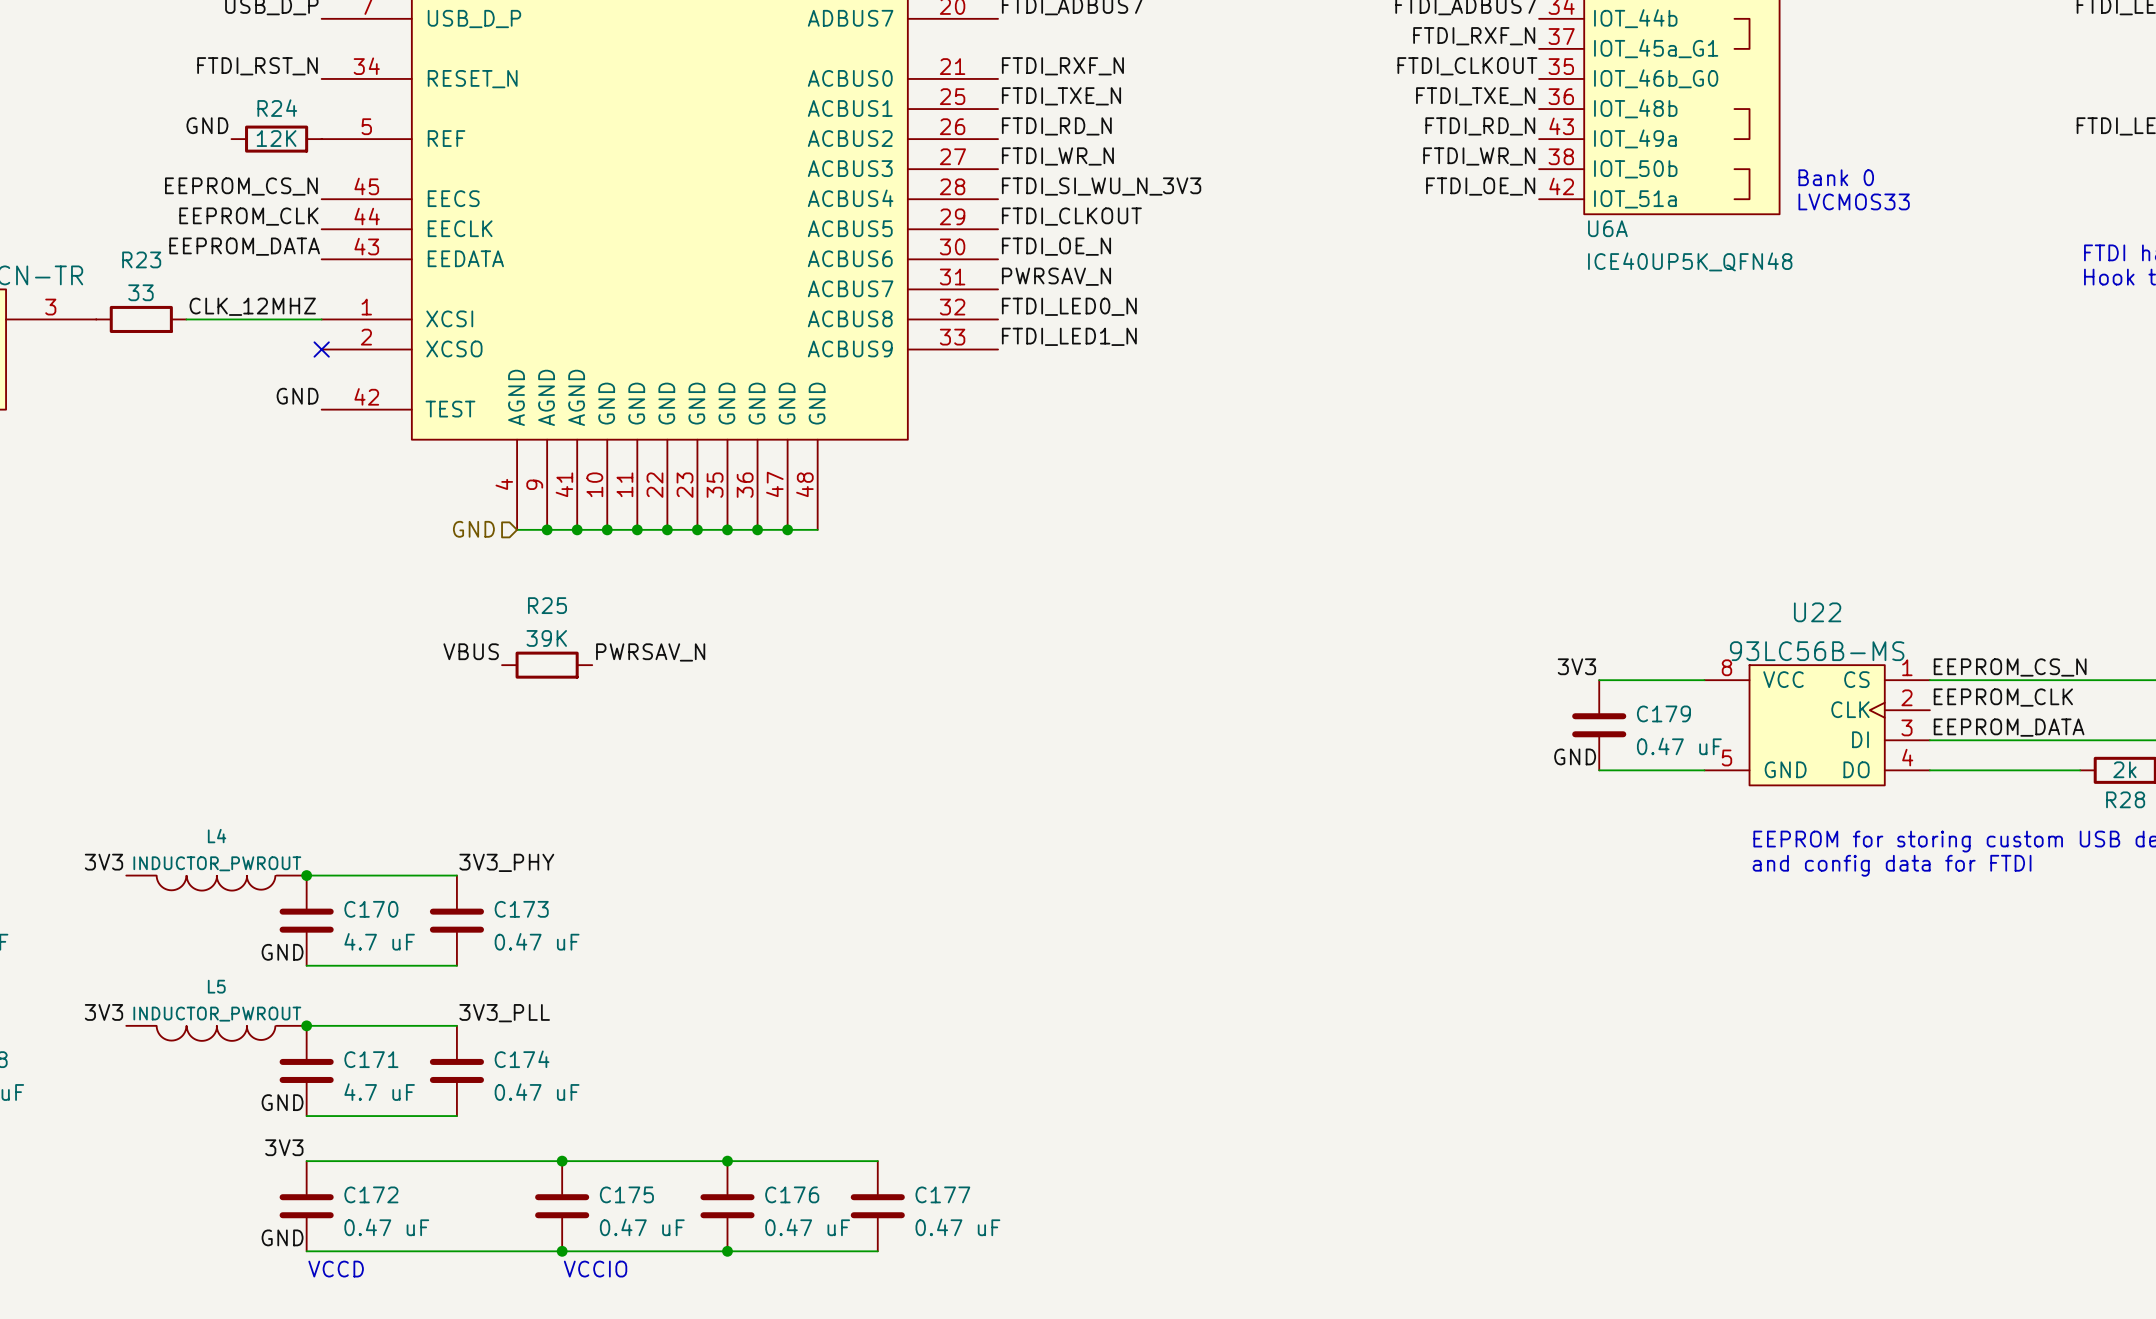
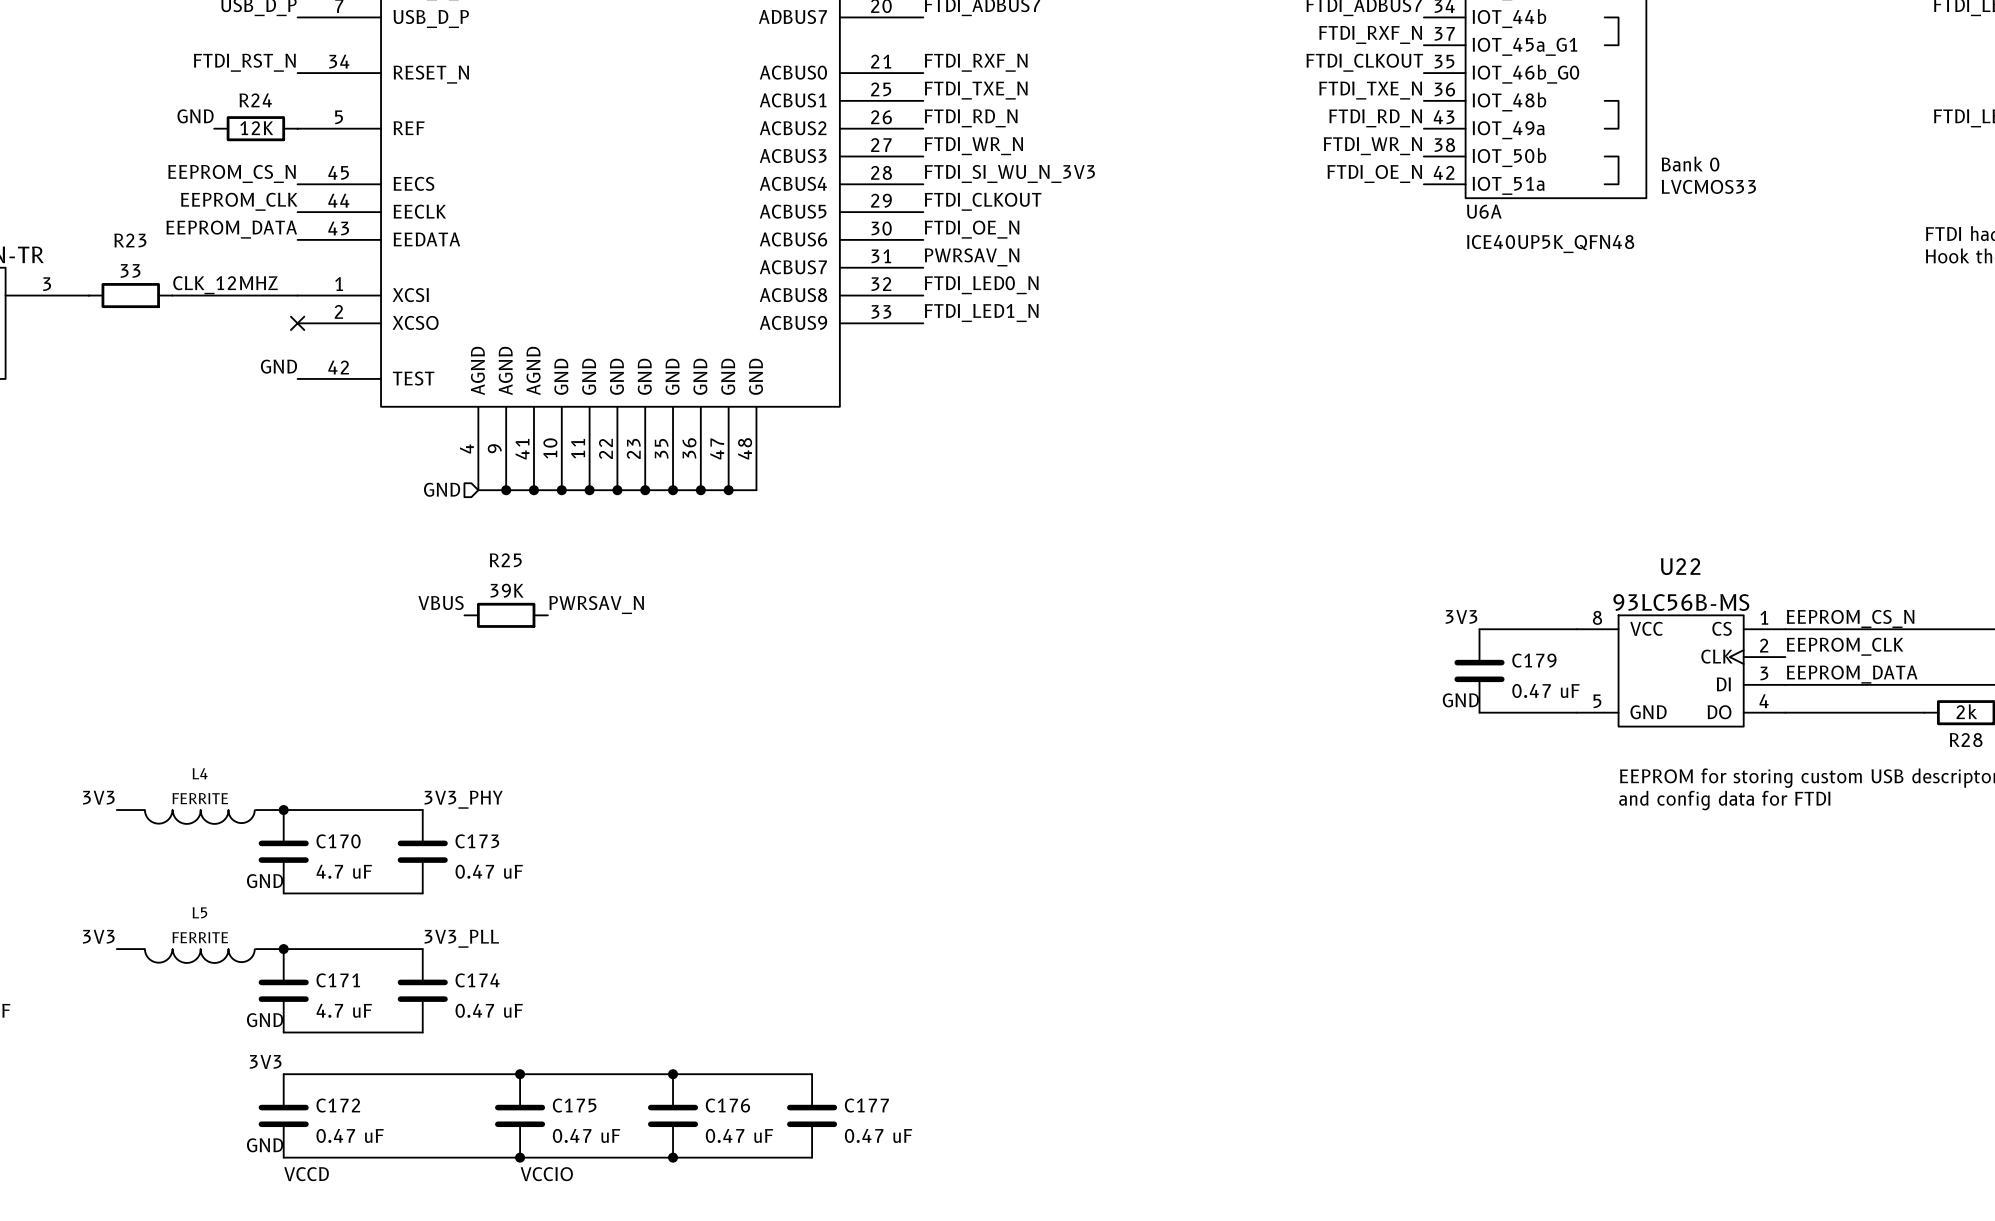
L4 value: INDUCTOR_PWROUT (217, 863) -> FERRITE (200, 798)
L5 value: INDUCTOR_PWROUT (217, 1014) -> FERRITE (200, 937)

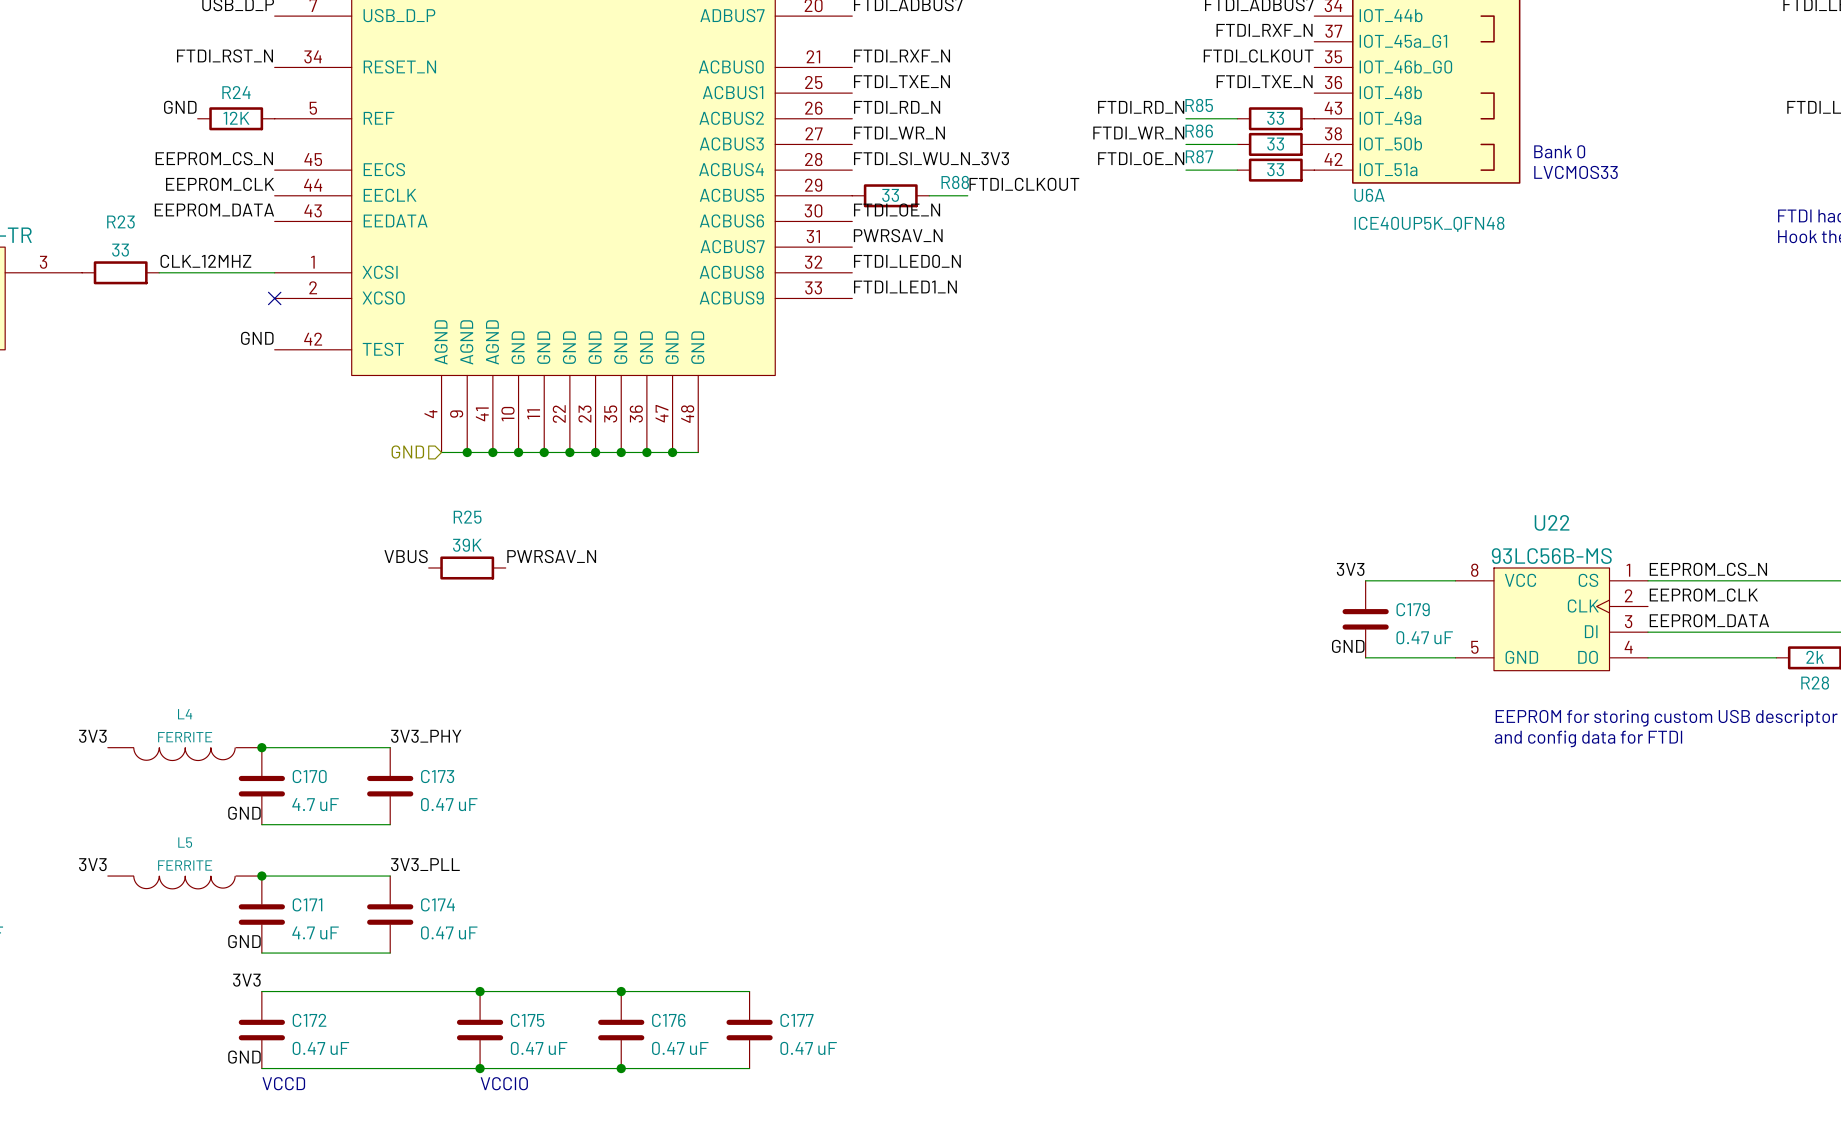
label position: FTDI_RD_N (1375, 118) -> FTDI_RD_N (1141, 107)
wire: none -> (1185, 118) (1237, 118)
R85: none -> 33 (1275, 118)
label position: FTDI_WR_N (1372, 146) -> FTDI_WR_N (1138, 132)
wire: none -> (1185, 144) (1237, 144)
R86: none -> 33 (1275, 144)
label position: FTDI_OE_N (1374, 173) -> FTDI_OE_N (1141, 158)
wire: none -> (1185, 170) (1237, 170)
R87: none -> 33 (1275, 170)
label position: FTDI_CLKOUT (983, 201) -> FTDI_CLKOUT (1024, 184)
R88: none -> 33 (890, 195)
wire: none -> (929, 195) (967, 195)

